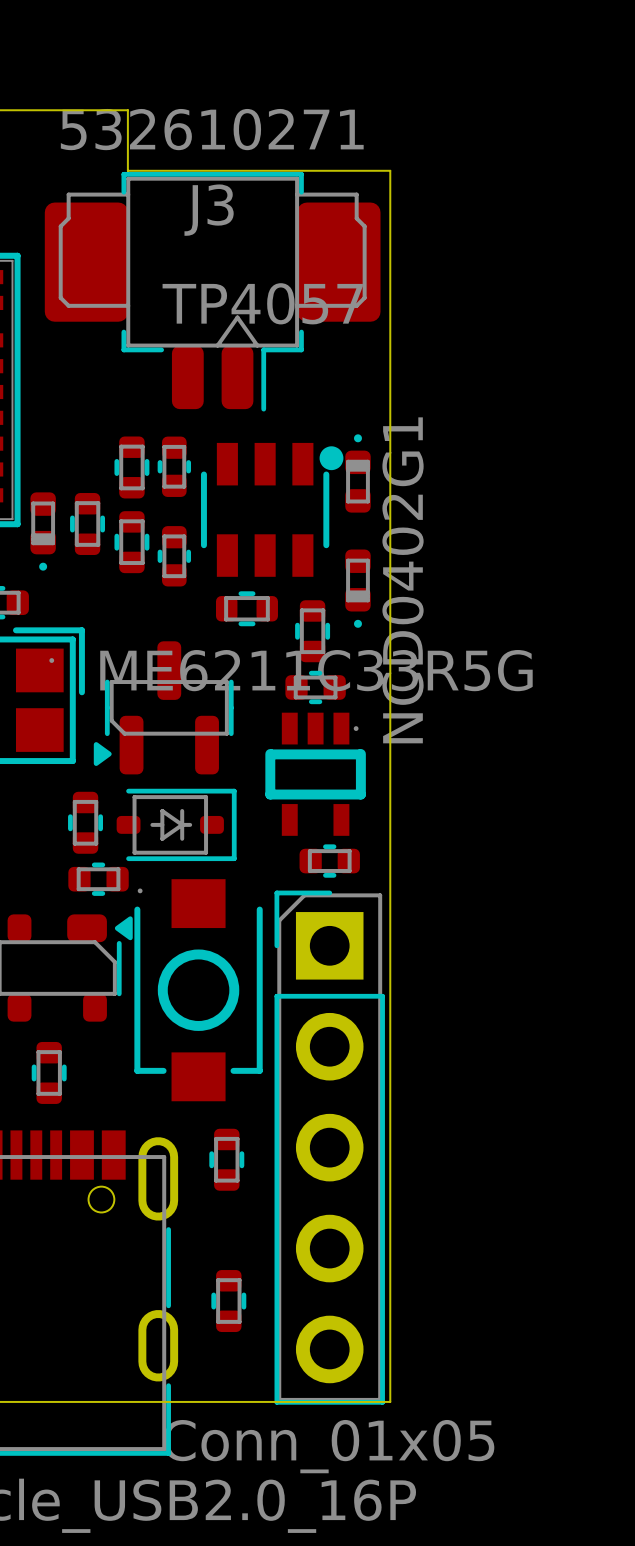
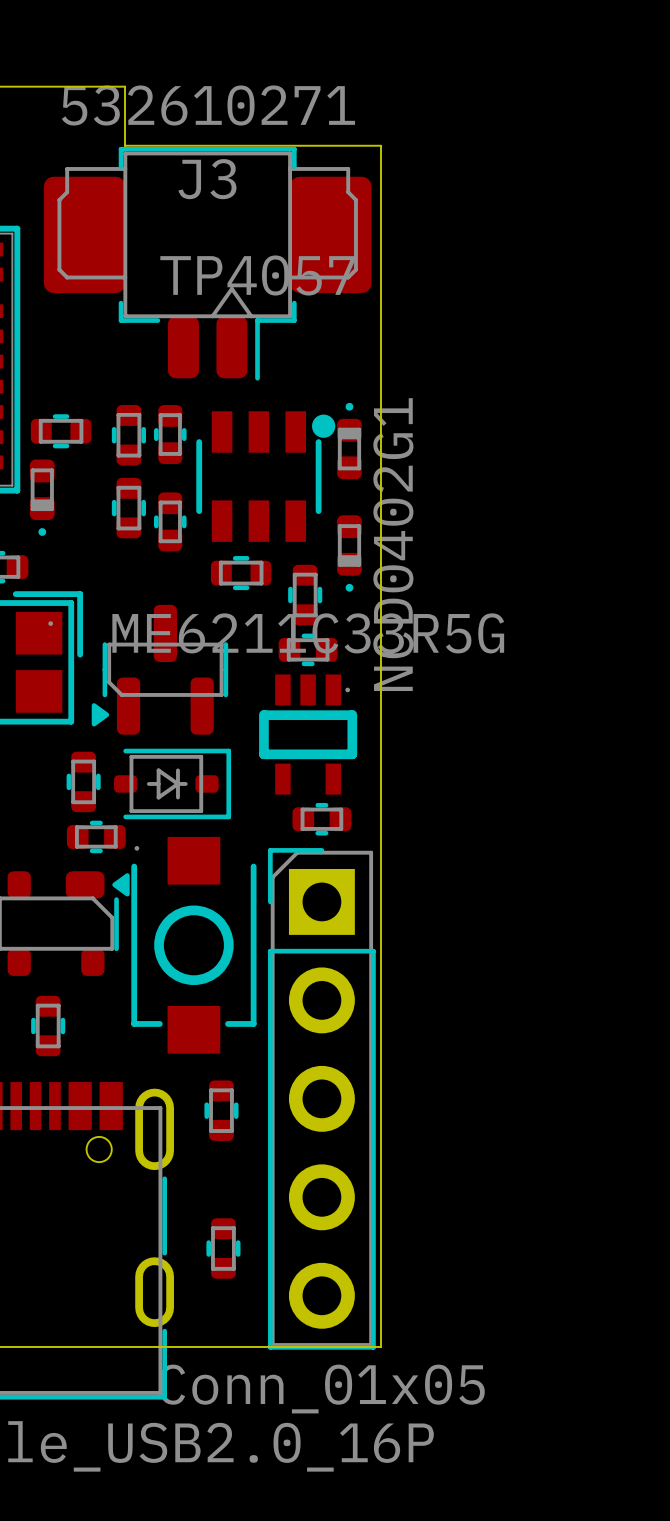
part rotation: 0° (87, 523) -> 90° clockwise (61, 431)
part position: (87, 523) -> (61, 431)

